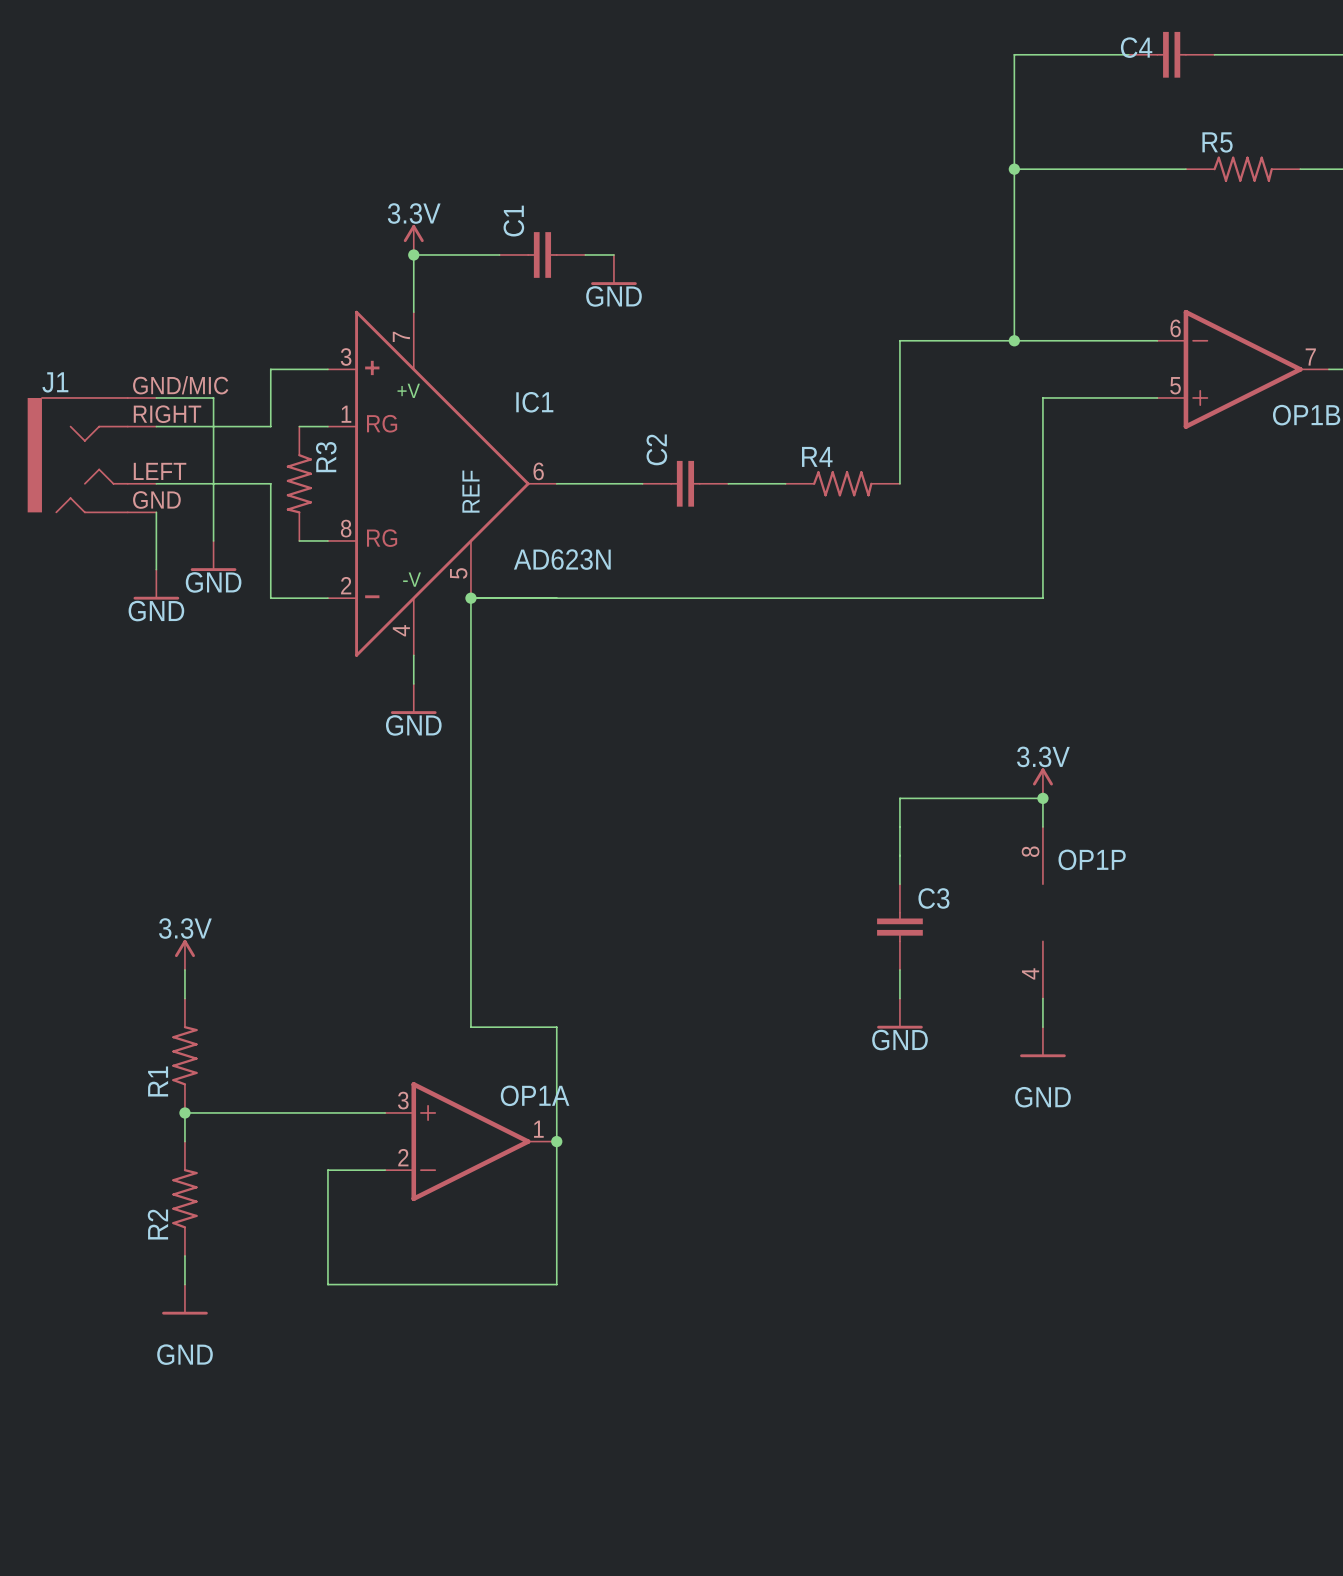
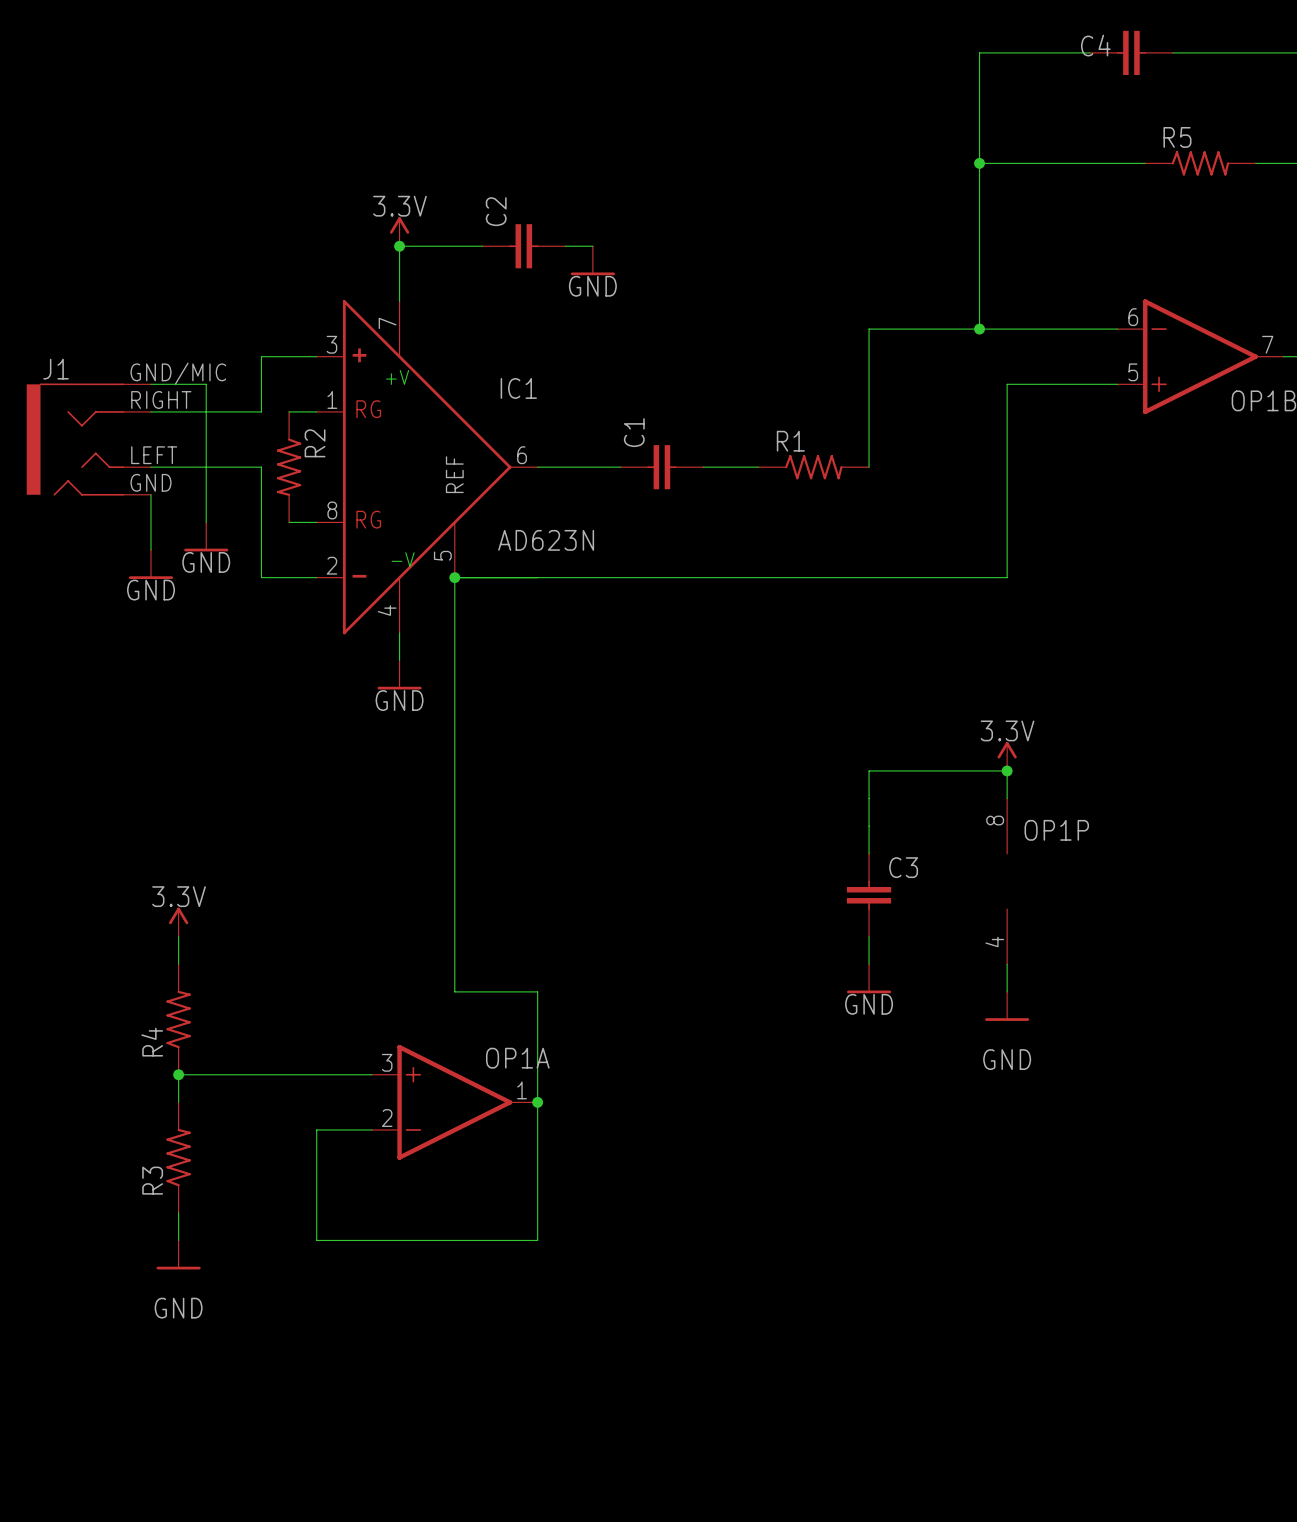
C1 name: C1 (513, 221) -> C2 (496, 211)
C2 name: C2 (656, 449) -> C1 (634, 432)
R4 name: R4 (817, 456) -> R1 (790, 441)
R3 name: R3 (326, 457) -> R2 (315, 443)
R1 name: R1 (158, 1081) -> R4 (152, 1042)
R2 name: R2 (157, 1224) -> R3 (152, 1180)

